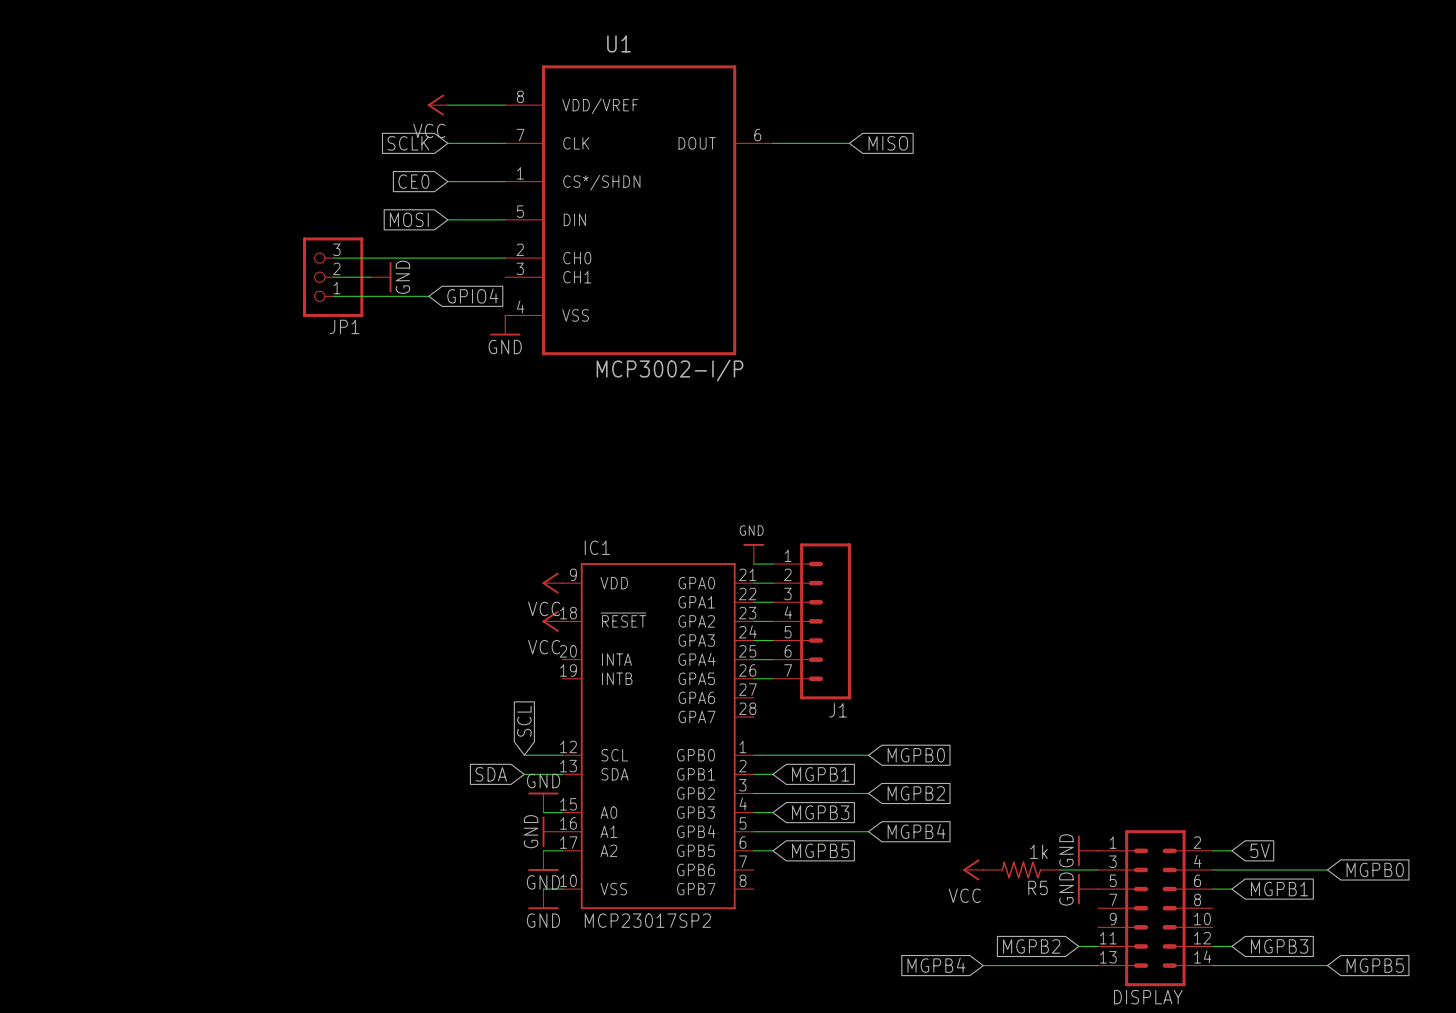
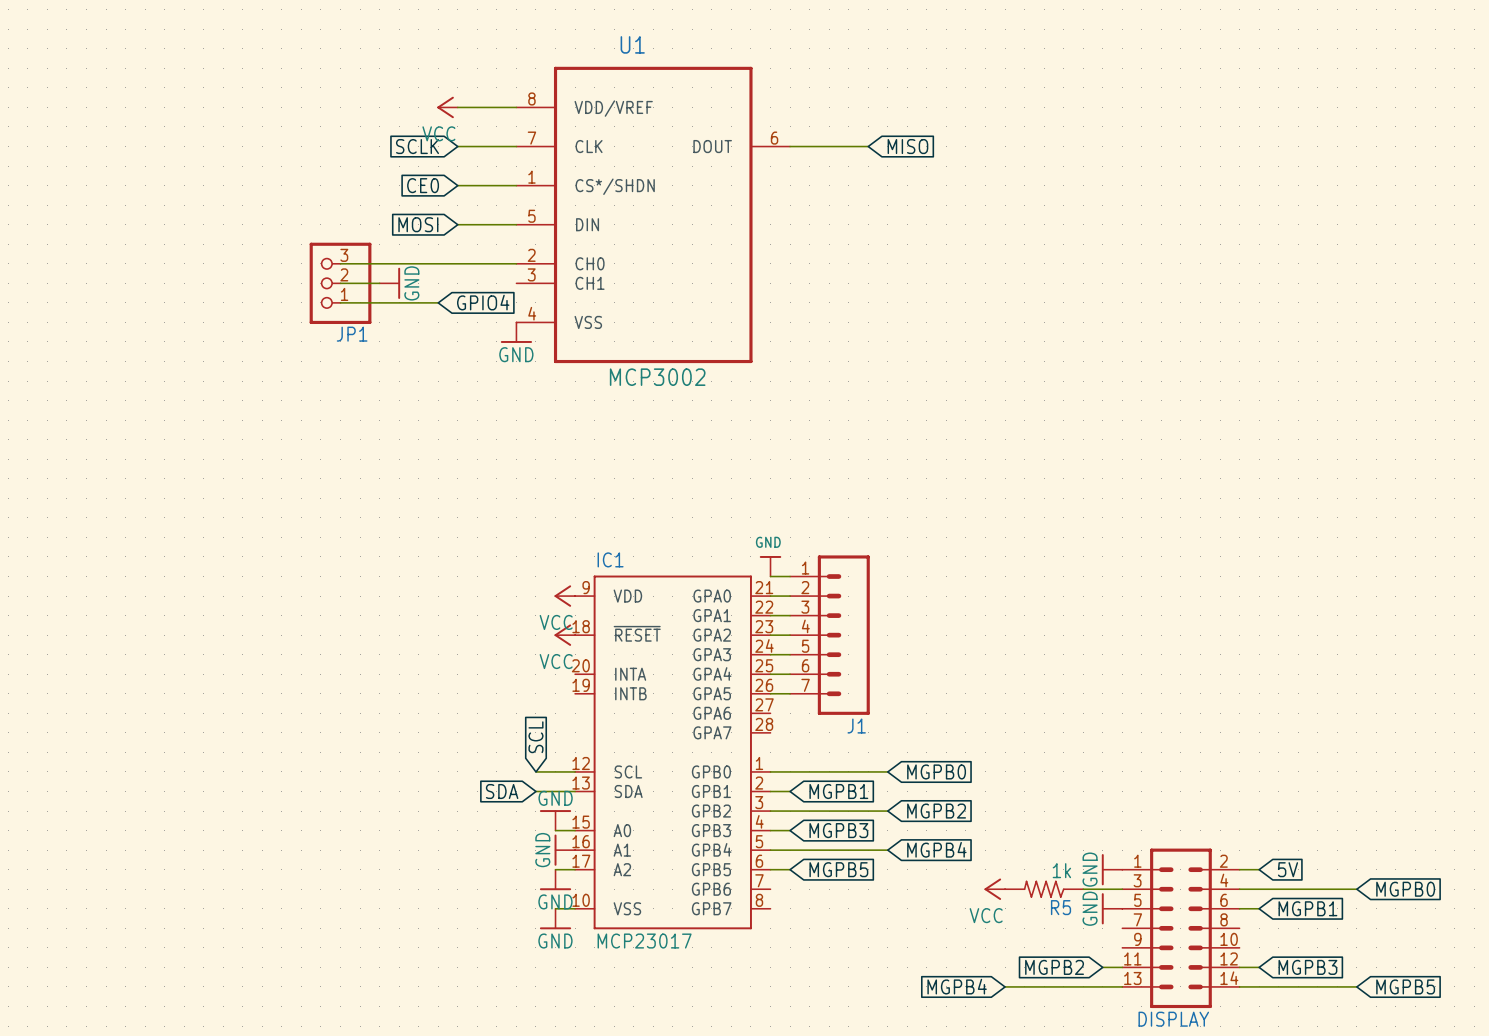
U1 value: MCP3002-I/P (669, 370) -> MCP3002 (657, 377)
IC1 value: MCP23017SP2 (647, 920) -> MCP23017 (644, 941)

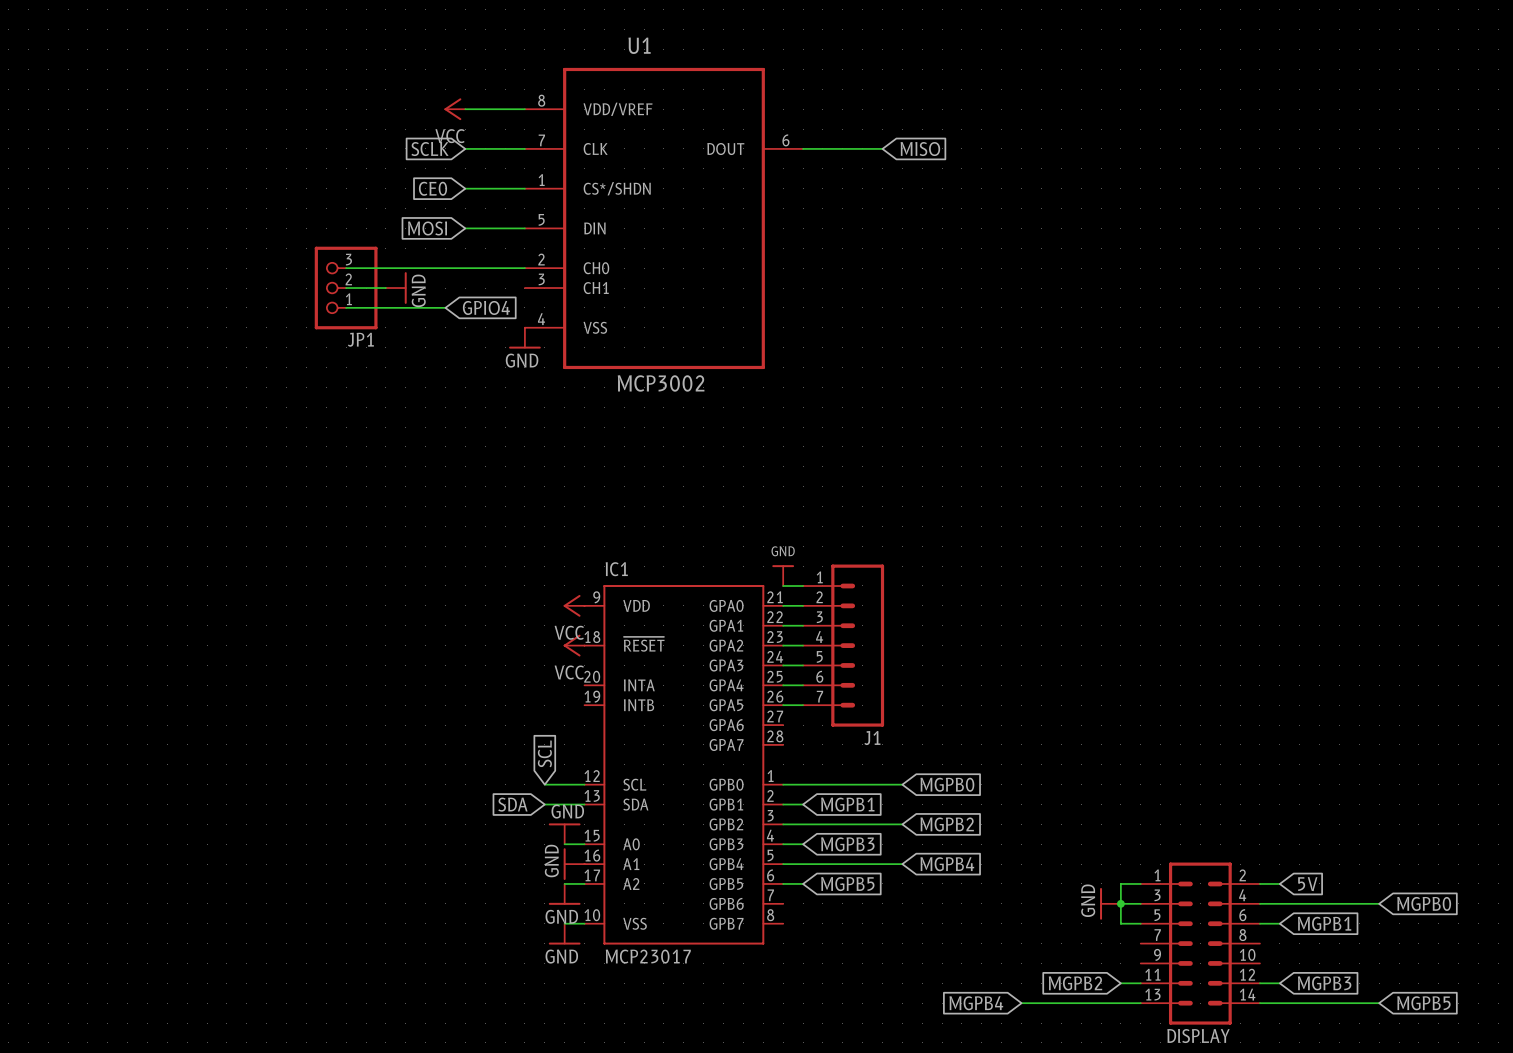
power symbol: GND (1112, 869) -> none
power symbol: VCC (994, 889) -> none
R5: 1k (1044, 889) -> none
power symbol: none -> GND (1110, 903)
junction: none -> (1120, 903)
power symbol: GND (1112, 908) -> none

